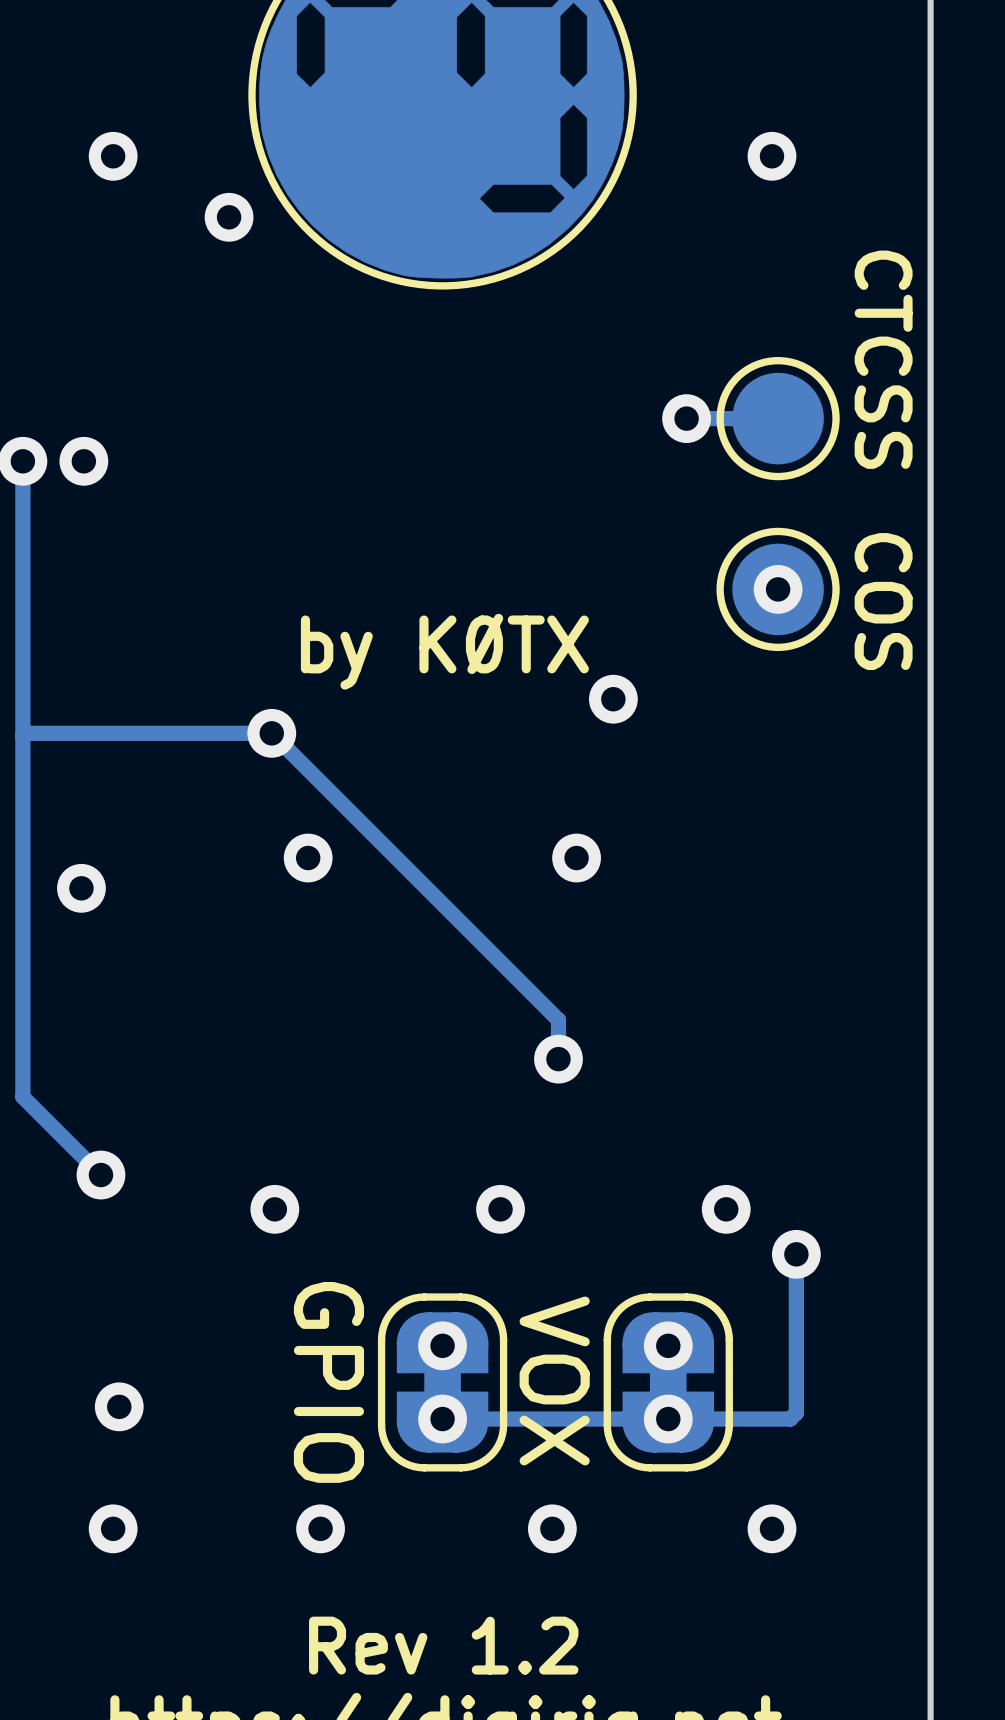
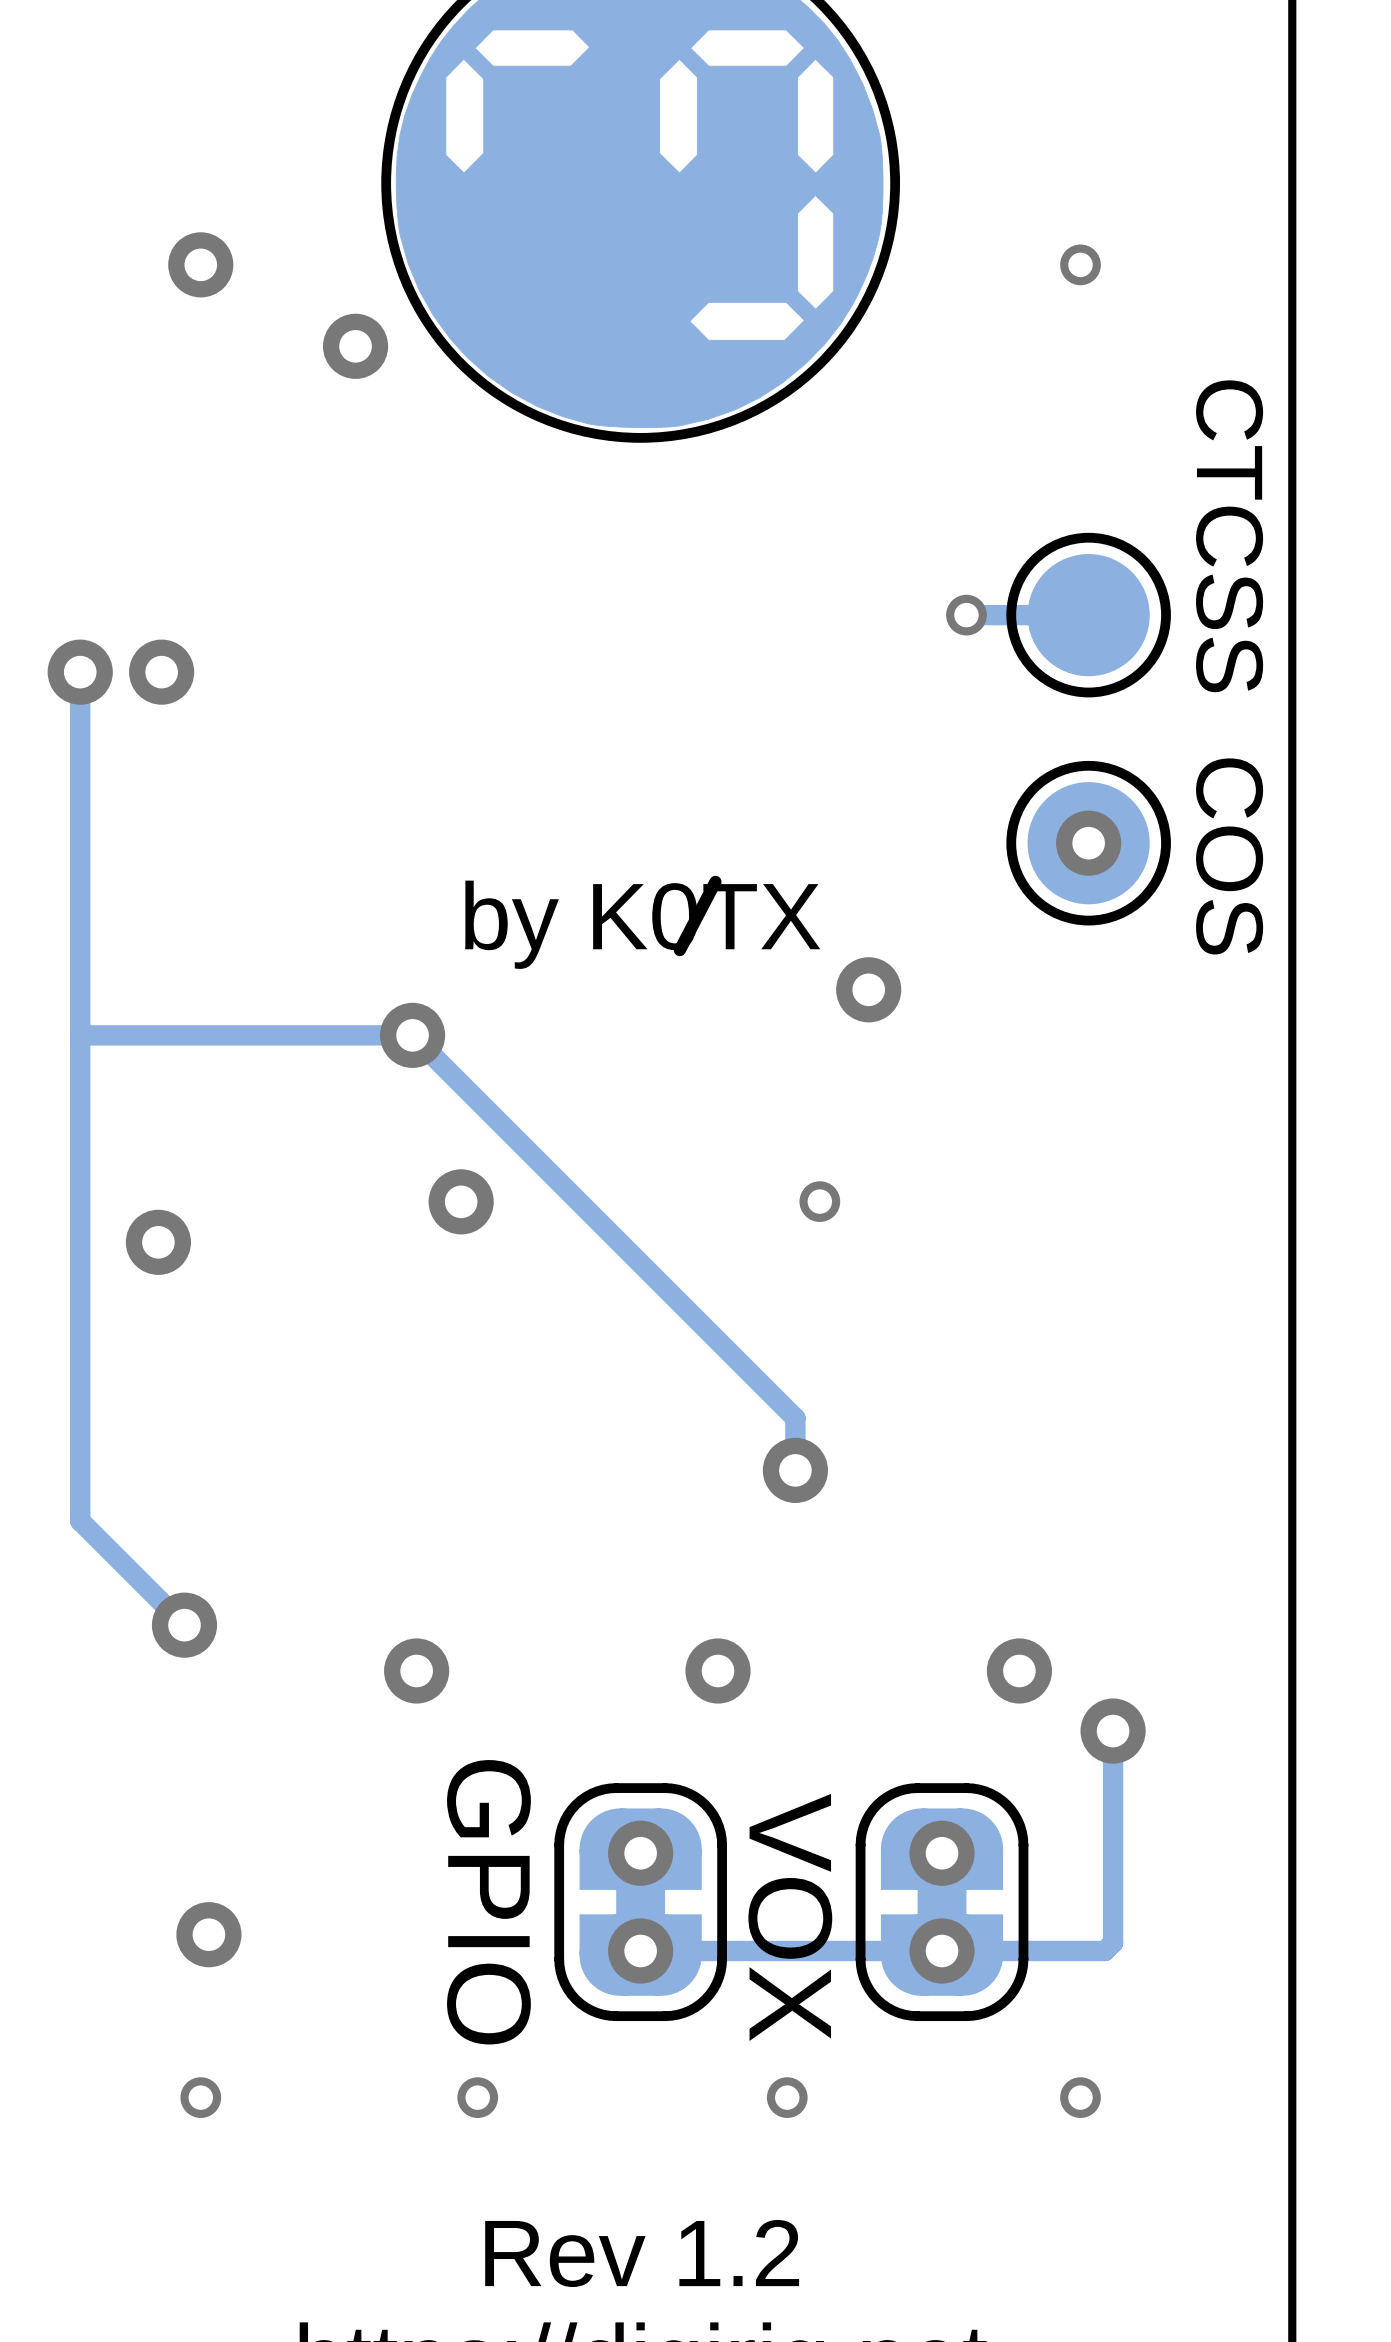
via size: [747, 131, 797, 181] -> [1060, 244, 1101, 286]
via size: [662, 394, 711, 444] -> [946, 594, 987, 636]
via size: [552, 833, 601, 883] -> [799, 1181, 841, 1222]
part value position: VOX (554, 1380) -> VOX (790, 1917)
via size: [88, 1504, 138, 1554] -> [180, 2077, 222, 2118]
via size: [296, 1504, 345, 1554] -> [457, 2077, 499, 2118]
via size: [527, 1504, 577, 1554] -> [766, 2077, 808, 2118]
via size: [747, 1504, 797, 1554] -> [1060, 2077, 1101, 2118]

